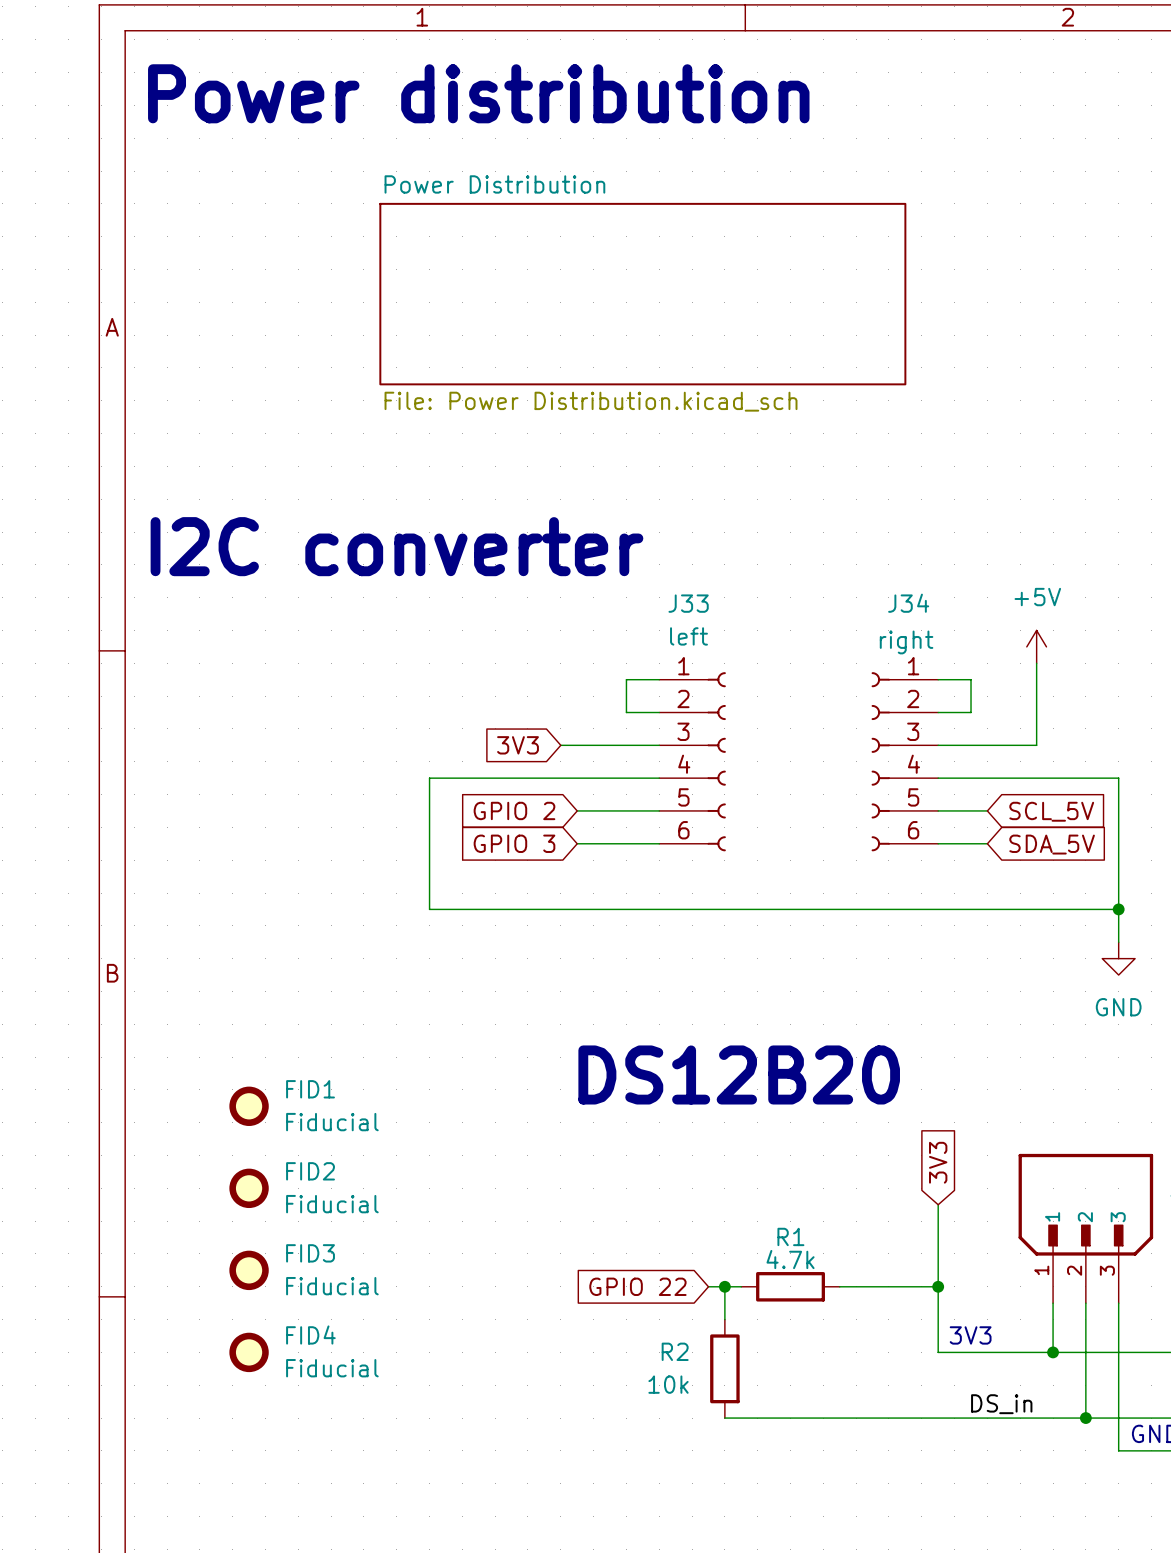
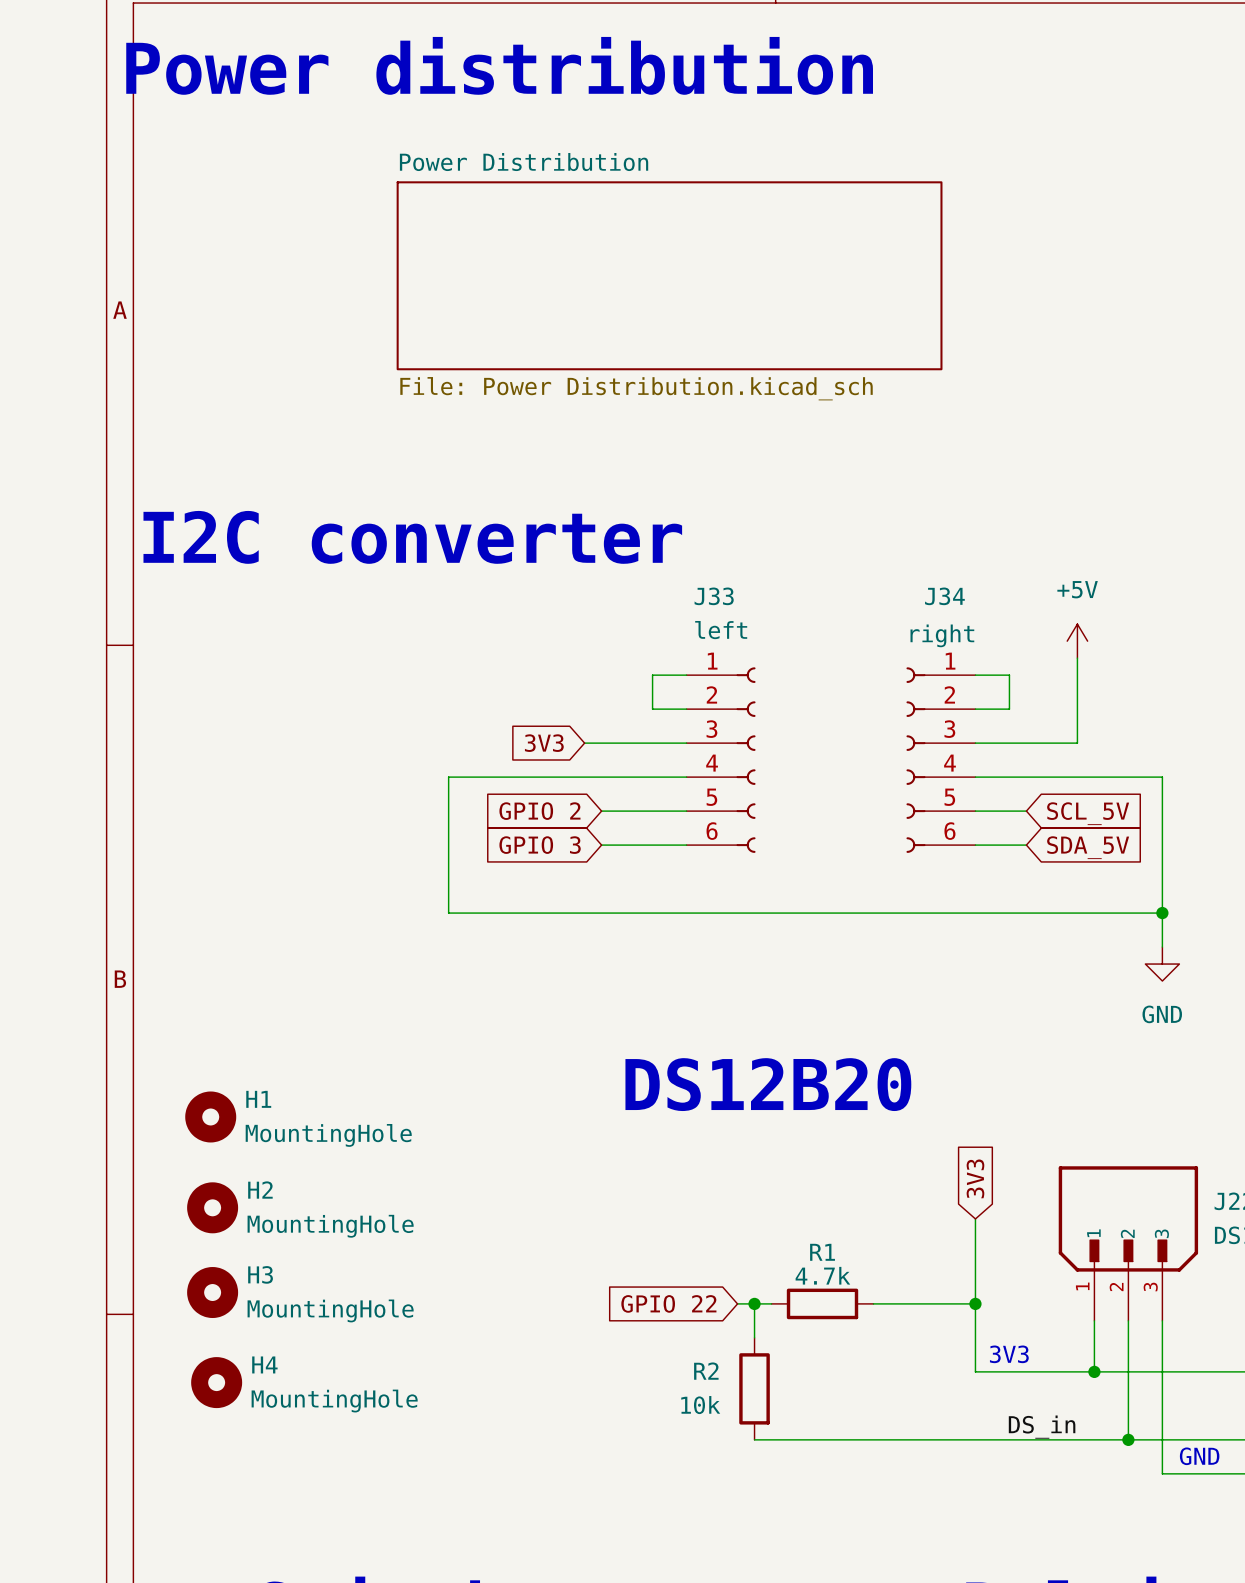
H1: none -> MountingHole (210, 1116)
FID1: Fiducial (249, 1106) -> none
FID2: Fiducial (249, 1188) -> none
H2: none -> MountingHole (212, 1207)
FID3: Fiducial (249, 1270) -> none
H3: none -> MountingHole (212, 1292)
FID4: Fiducial (249, 1352) -> none
H4: none -> MountingHole (216, 1382)

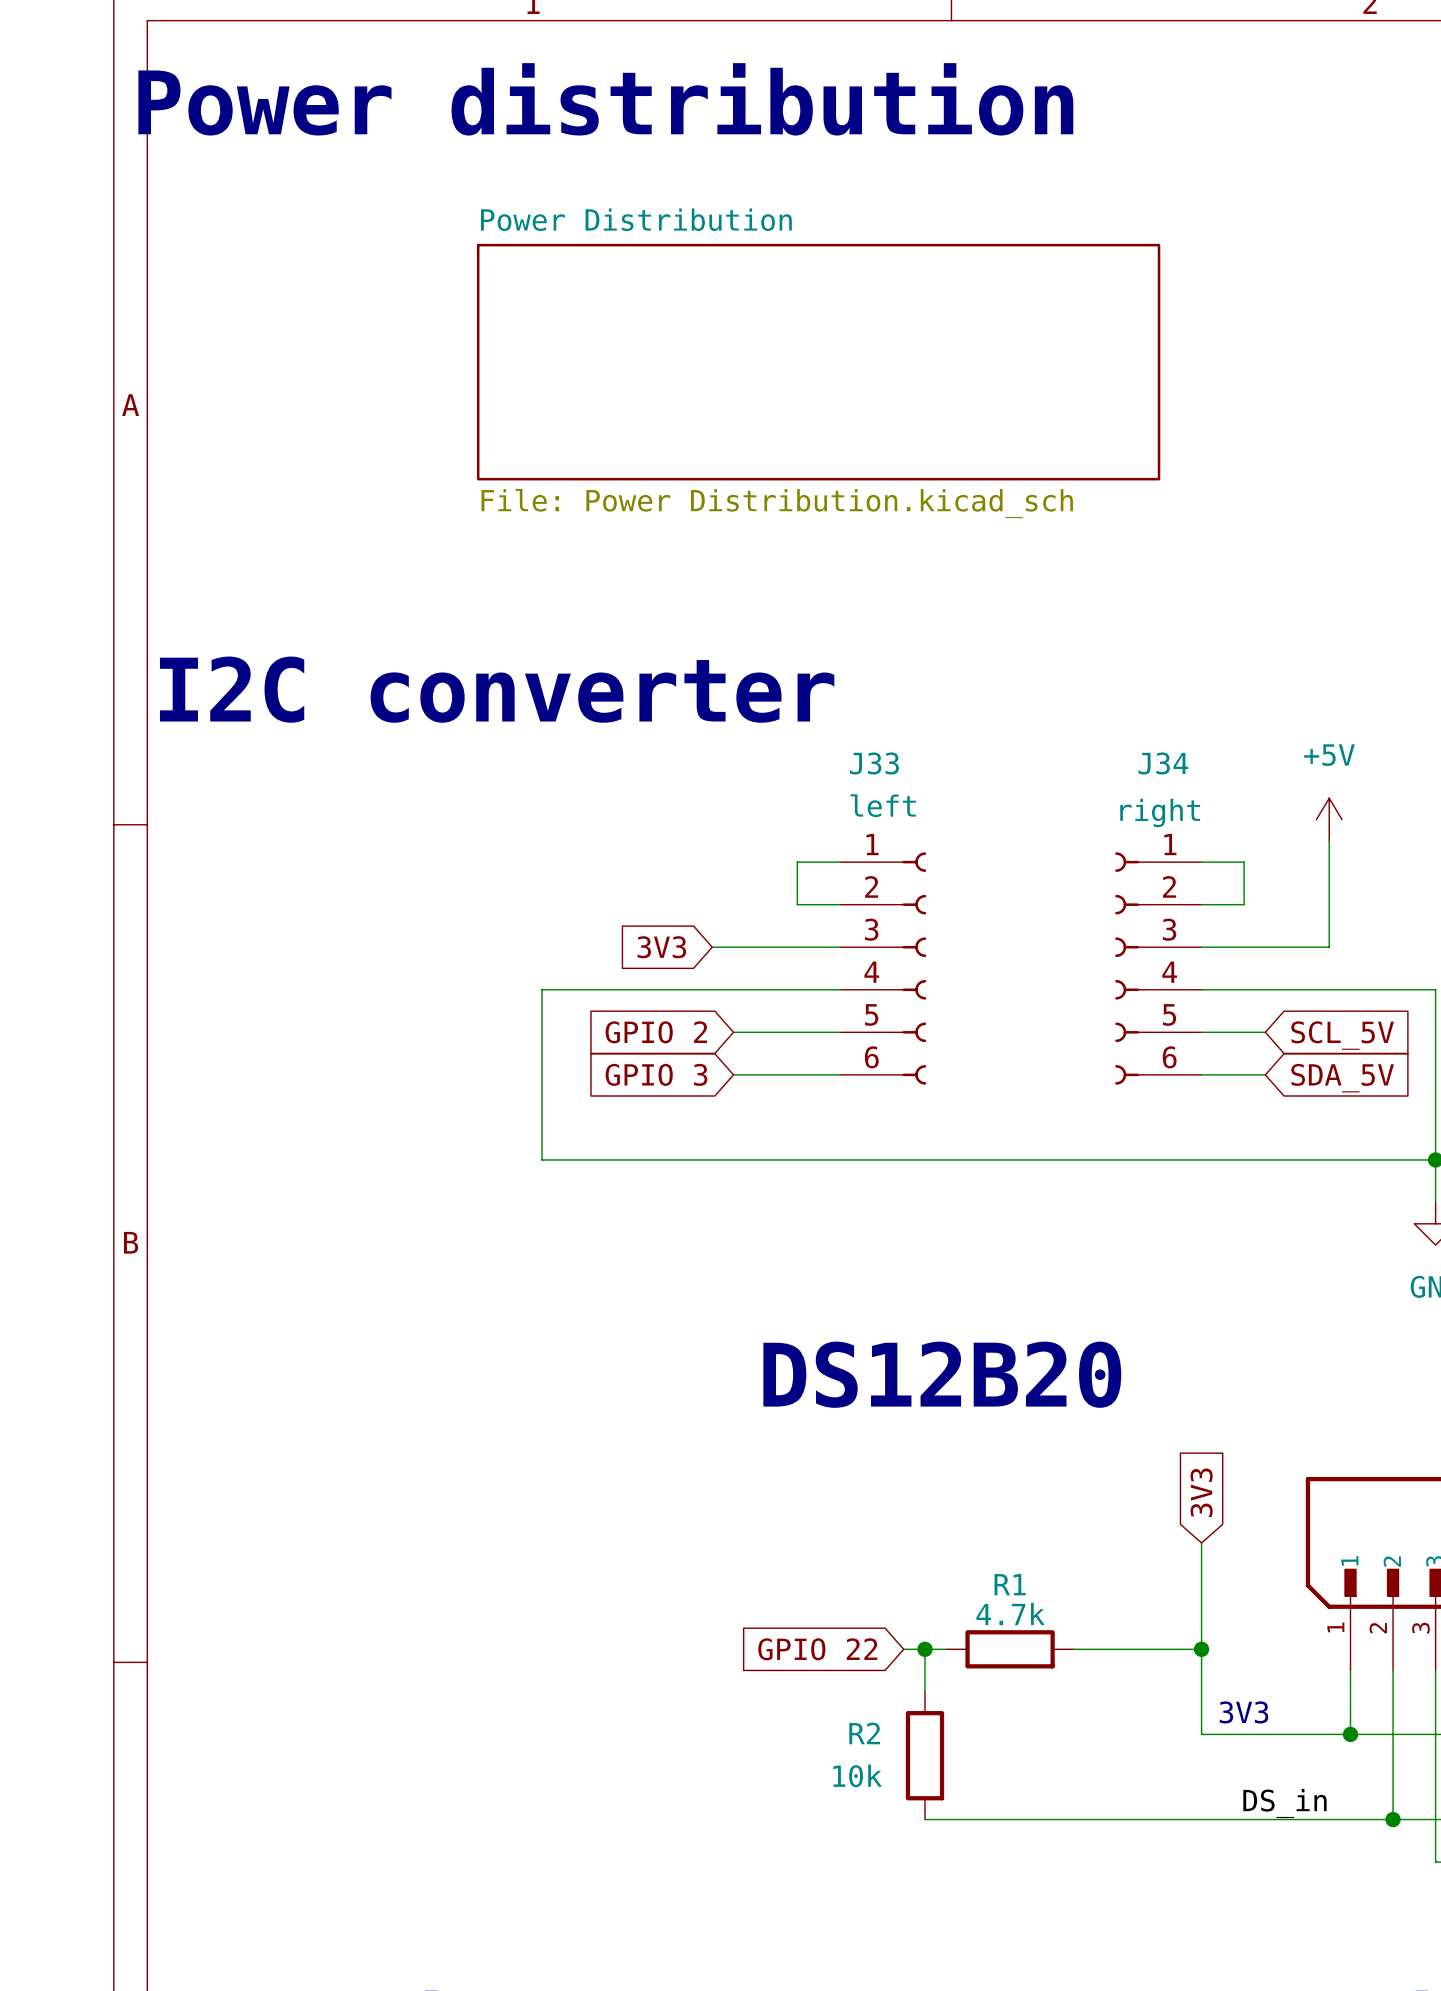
H1: MountingHole (210, 1116) -> none
H2: MountingHole (212, 1207) -> none
H3: MountingHole (212, 1292) -> none
H4: MountingHole (216, 1382) -> none

